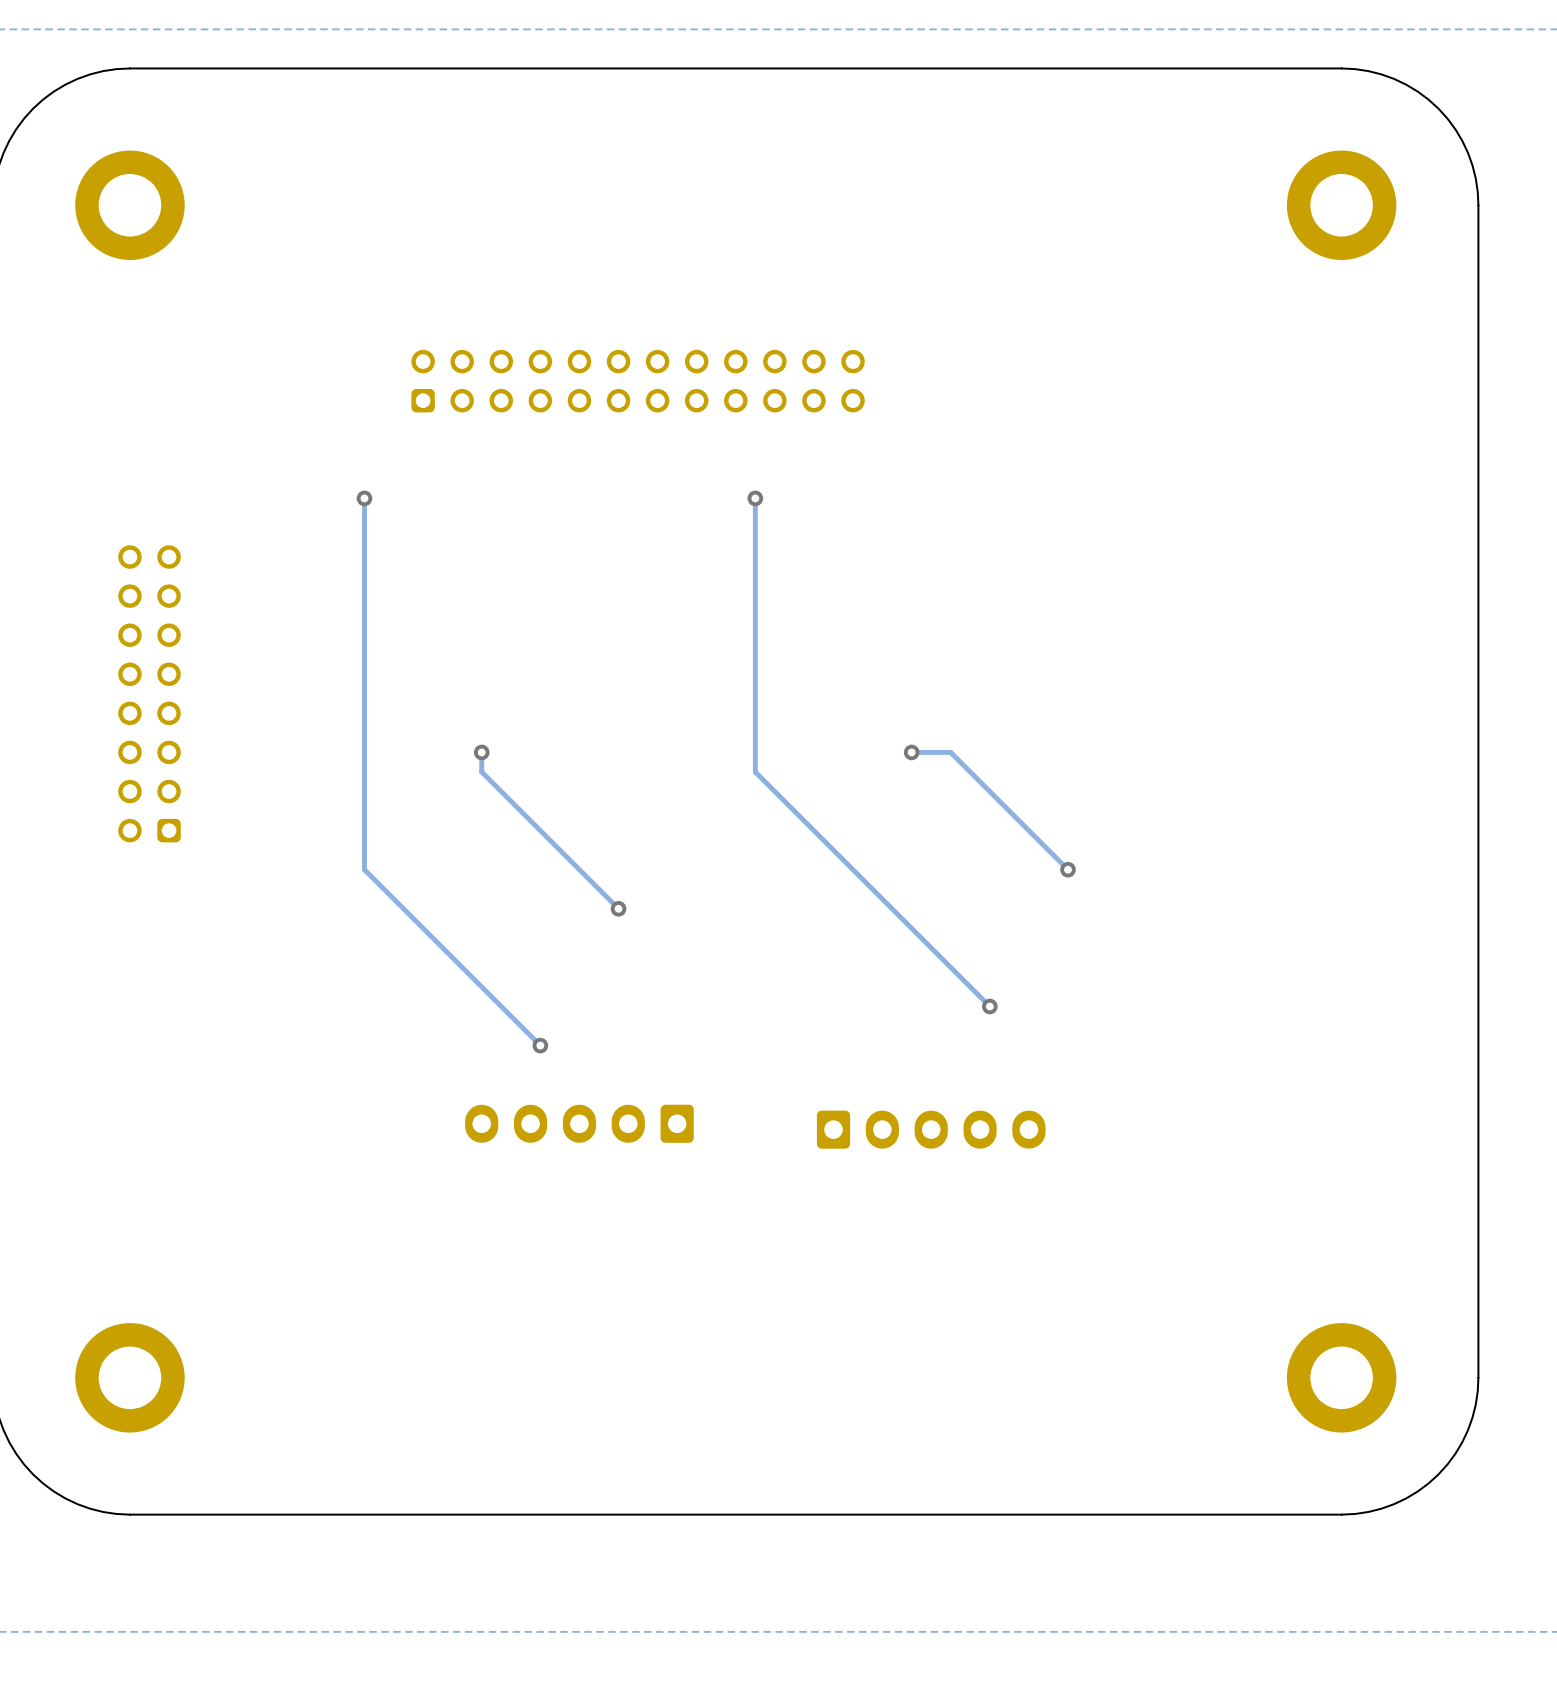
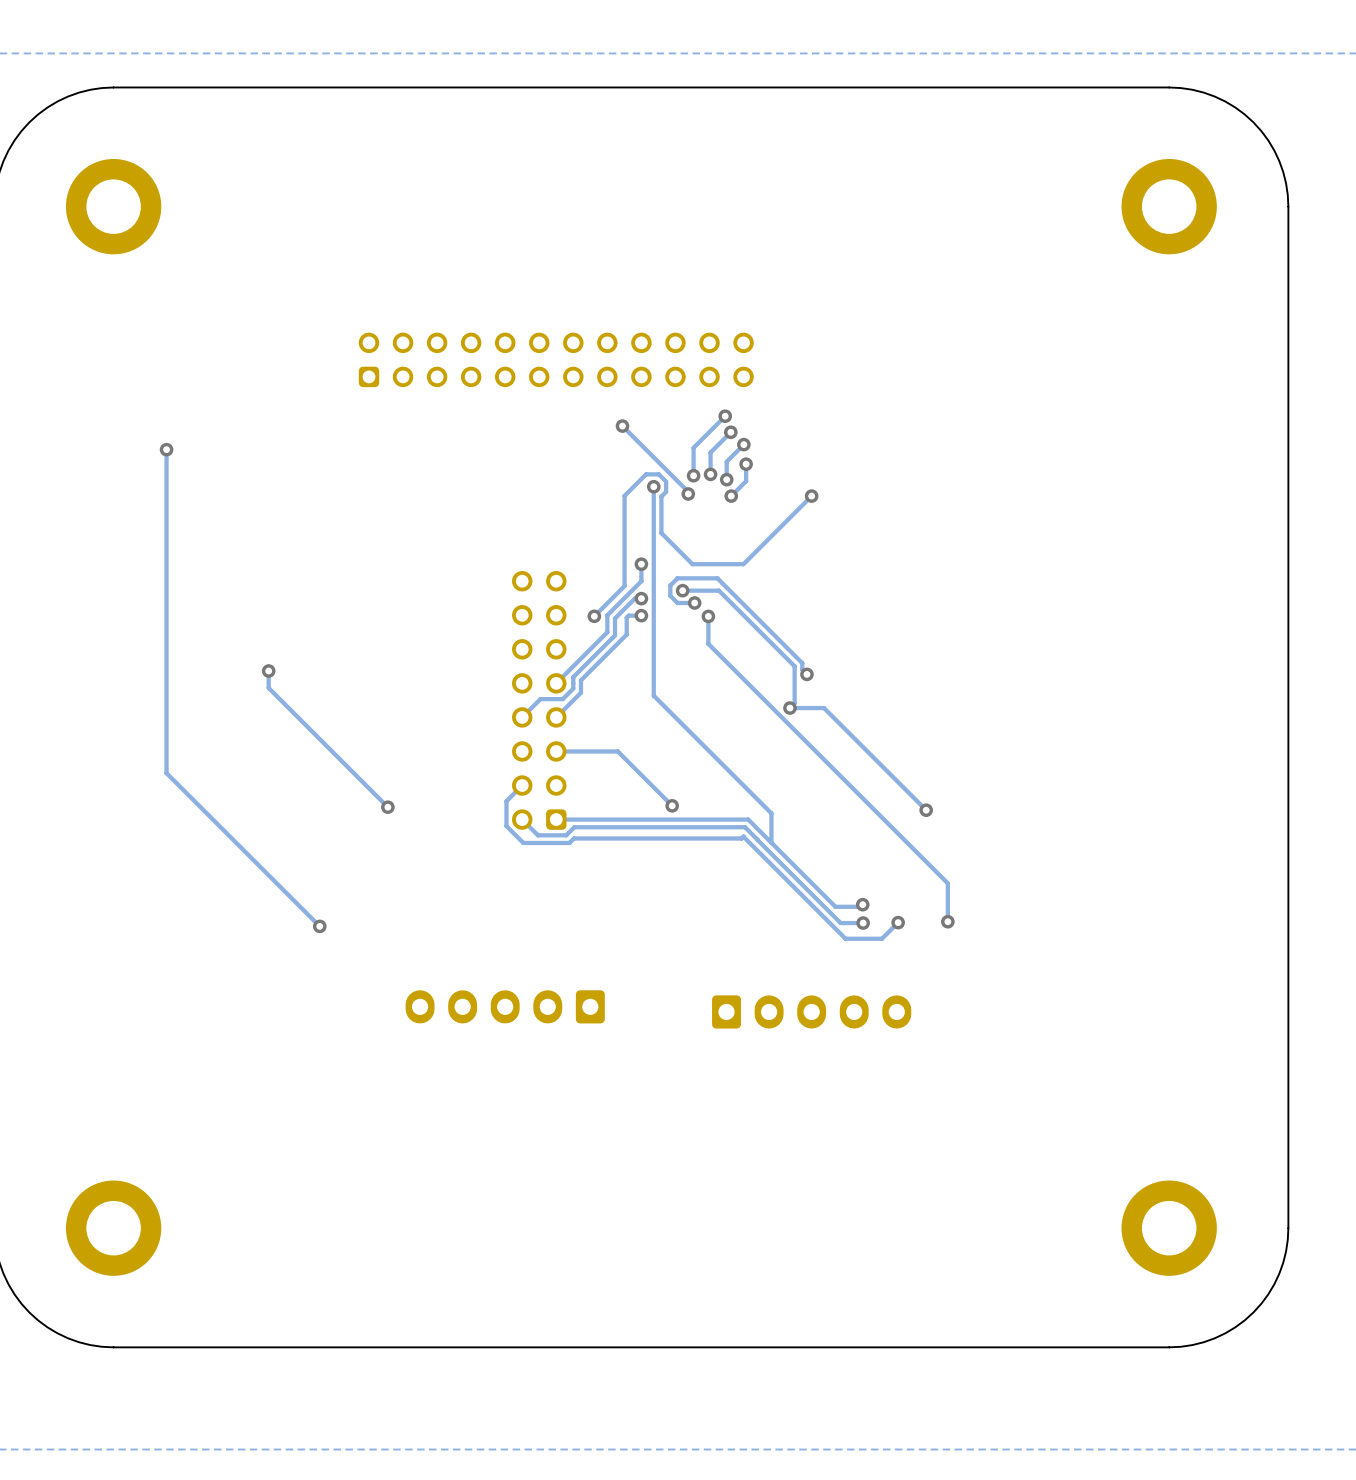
track: none -> (725, 416) (693, 447) (693, 475)
via: none -> (725, 416)
track: none -> (622, 426) (688, 493)
via: none -> (622, 426)
track: none -> (730, 432) (710, 452) (710, 474)
via: none -> (730, 432)
track: none -> (743, 444) (726, 461) (726, 479)
via: none -> (743, 444)
via: none -> (166, 449)
track: (364, 498) (364, 869) (540, 1045) -> (166, 449) (166, 773) (319, 926)
via: (364, 498) -> none
track: (755, 498) (755, 772) -> (653, 486) (653, 695) (658, 700)
via: (755, 498) -> none
track: none -> (746, 464) (746, 481) (731, 496)
via: none -> (746, 464)
via: none -> (710, 474)
via: none -> (693, 475)
via: none -> (726, 479)
via: none -> (653, 486)
via: none -> (688, 493)
via: none -> (731, 496)
track: none -> (811, 496) (743, 564) (692, 564) (661, 533) (661, 496) (666, 491) (666, 481) (658, 474) (646, 474) (624, 495) (624, 586) (594, 616)
via: none -> (811, 496)
track: none -> (641, 564) (641, 581) (607, 615) (607, 632) (556, 683)
via: none -> (641, 564)
track: none -> (682, 590) (718, 590) (794, 666) (794, 703) (789, 708) (824, 708) (926, 810)
via: none -> (682, 590)
track: none -> (641, 598) (634, 598) (615, 618) (615, 635) (573, 677) (573, 688) (562, 699) (540, 699) (522, 717)
via: none -> (641, 598)
track: none -> (694, 603) (677, 603) (670, 595) (670, 585) (677, 578) (717, 578) (802, 663) (802, 669) (806, 674)
via: none -> (694, 603)
track: none -> (641, 615) (628, 615) (626, 617) (626, 634) (580, 680) (580, 692) (556, 717)
via: none -> (641, 615)
via: none -> (594, 616)
track: none -> (708, 616) (708, 643) (947, 883) (947, 921)
via: none -> (708, 616)
part position: (149, 693) -> (539, 700)
via: none -> (268, 671)
track: (481, 752) (481, 772) (618, 908) -> (268, 671) (268, 688) (387, 807)
via: (481, 752) -> none
track: (911, 752) (950, 752) (1068, 869) -> none
via position: (911, 752) -> (806, 674)
via: none -> (789, 708)
track: none -> (556, 751) (617, 751) (672, 805)
track: none -> (522, 785) (506, 801) (506, 826) (523, 842) (569, 842) (573, 838) (741, 838) (743, 836)
via position: (1068, 869) -> (926, 810)
via: none -> (672, 805)
via: none -> (387, 807)
track: (885, 901) (989, 1006) -> (771, 813) (771, 842)
track: none -> (522, 819) (537, 835) (566, 835) (574, 827) (745, 827) (757, 839)
via: (618, 908) -> none
track: none -> (556, 819) (748, 819) (835, 906) (858, 906)
track: none -> (743, 836) (845, 938) (882, 938) (898, 922)
track: none -> (757, 839) (840, 923) (863, 923)
via: none -> (947, 921)
via: none -> (863, 923)
via: none -> (898, 922)
via: none -> (319, 926)
via: (540, 1045) -> none

